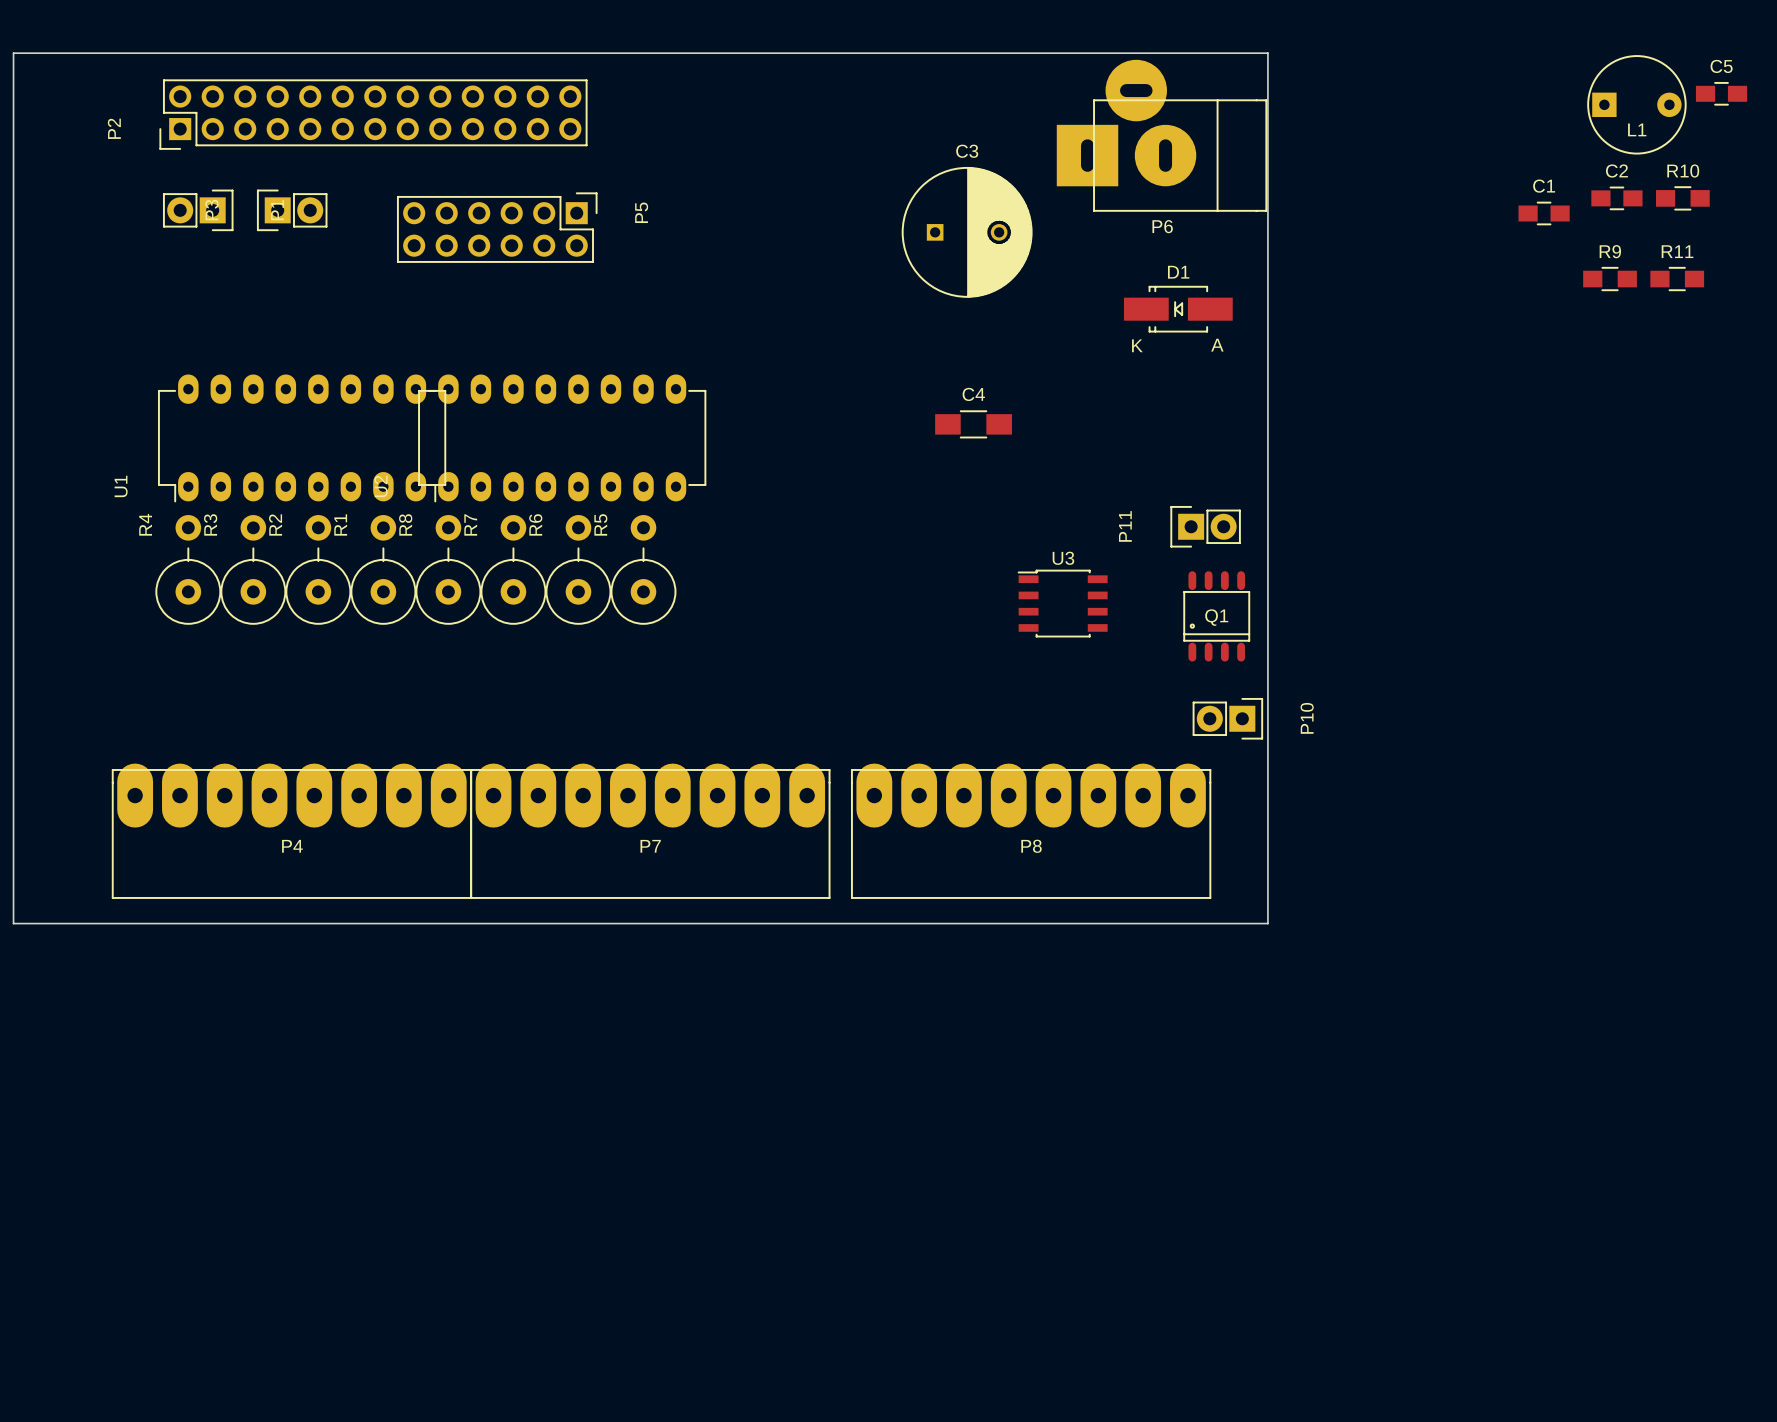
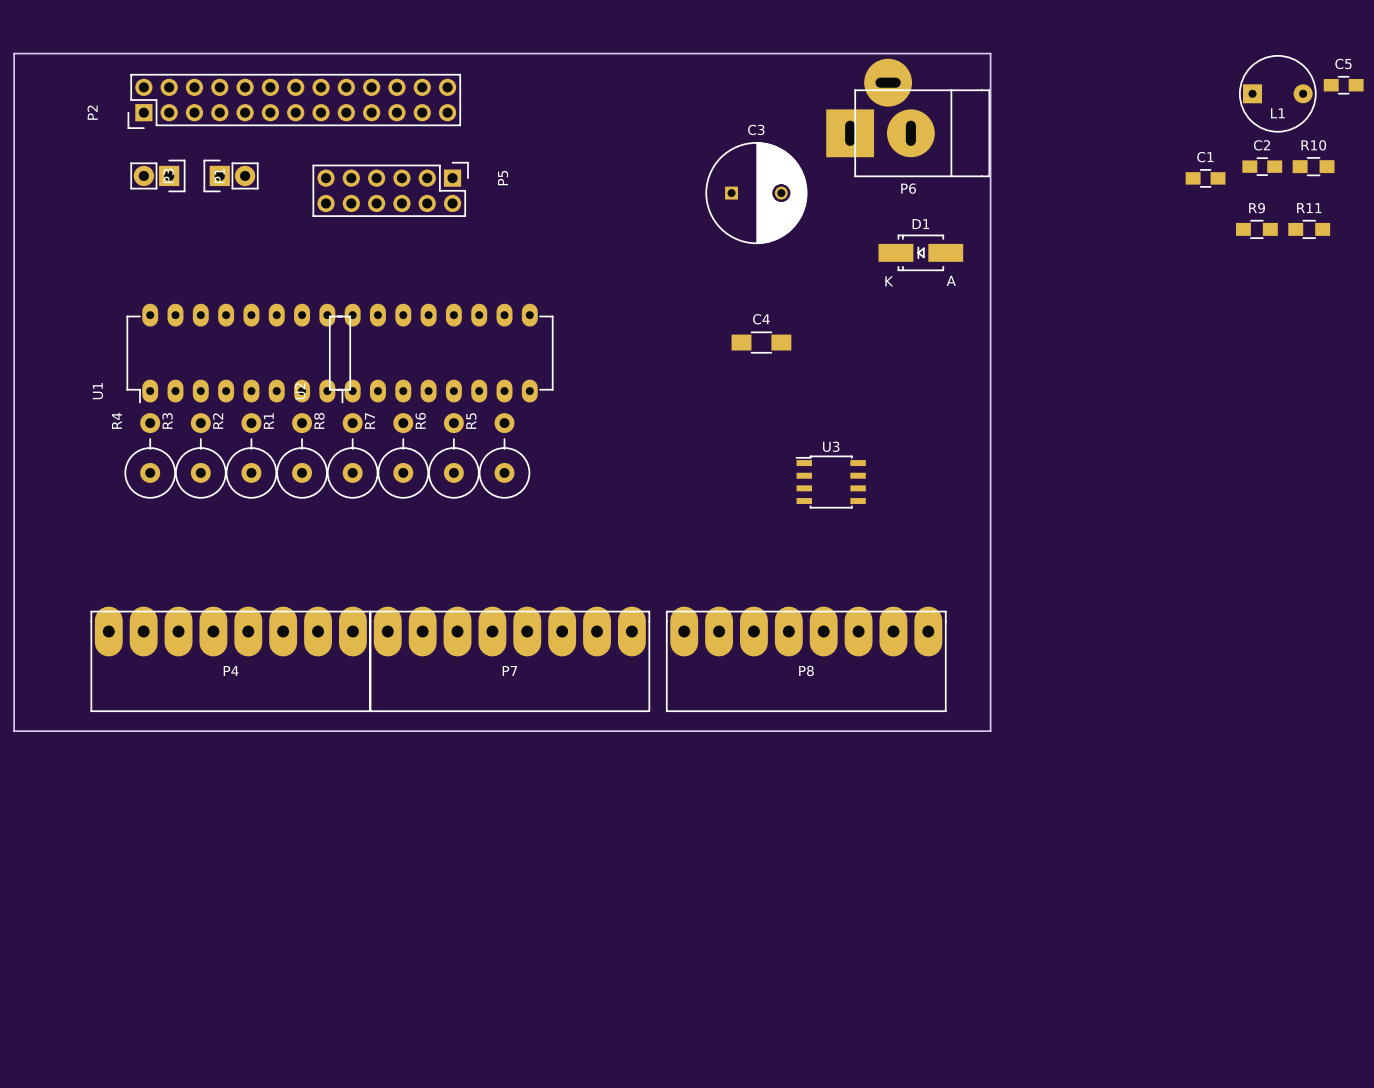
P11: (1205, 526) -> none
Q1: (1216, 616) -> none
P10: (1227, 718) -> none

